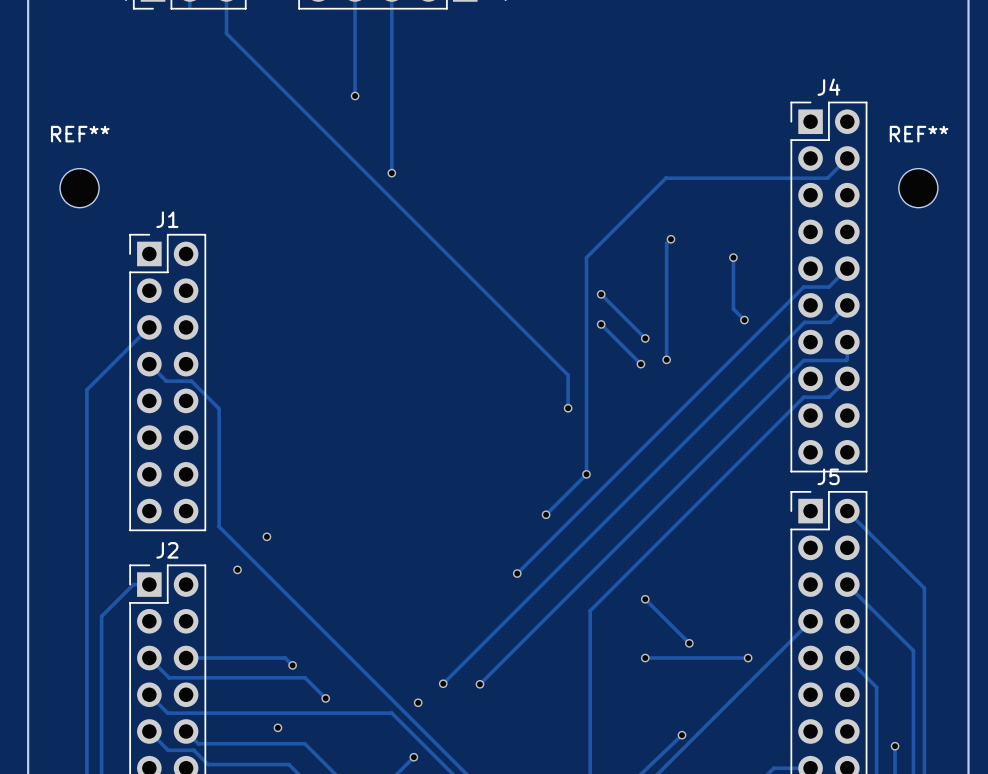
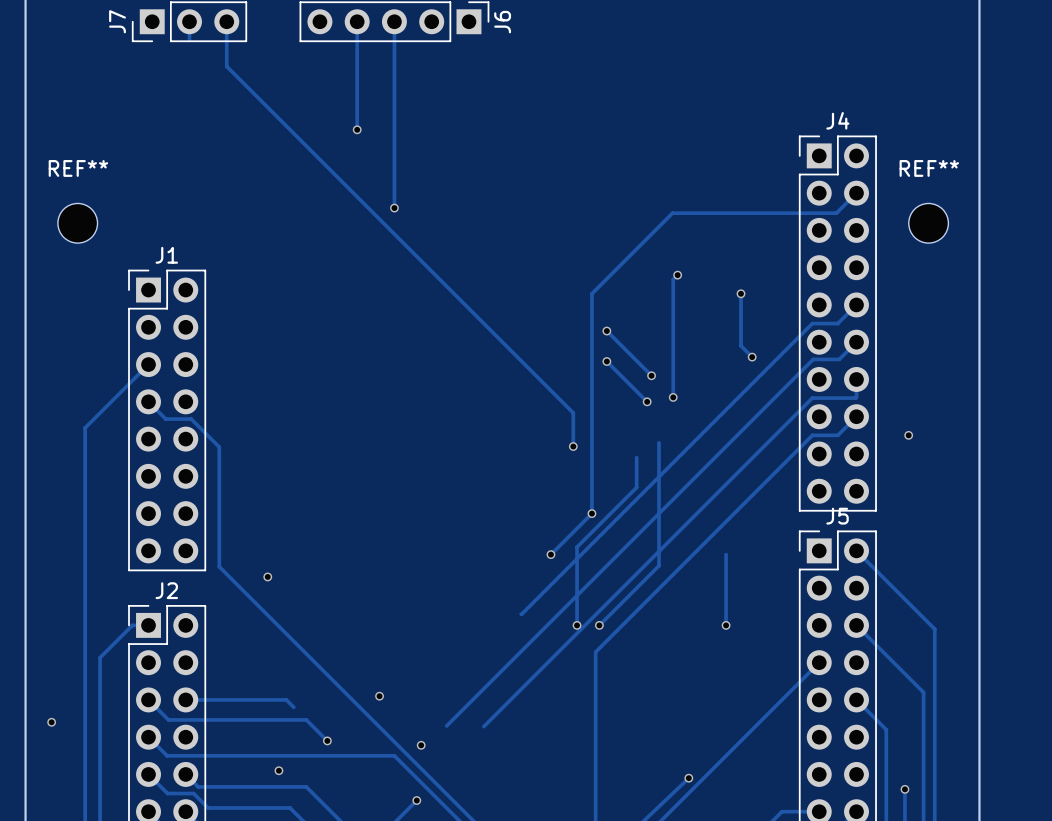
via: none -> (908, 435)
track: none -> (659, 442) (659, 565) (599, 625)
track: none -> (636, 457) (636, 487) (577, 547) (577, 625)
track: none -> (726, 554) (726, 625)
via: (237, 569) -> none
via: (517, 573) -> none
via: none -> (577, 625)
via: none -> (599, 625)
via: none -> (726, 625)
track: (645, 599) (689, 643) -> none
via: (645, 599) -> none
via: (689, 643) -> none
via: none -> (379, 696)
track: (645, 658) (748, 658) -> none
via: (645, 658) -> none
via: (748, 658) -> none
via: (292, 665) -> none
via: none -> (51, 722)
via: (443, 683) -> none
via: (479, 684) -> none

